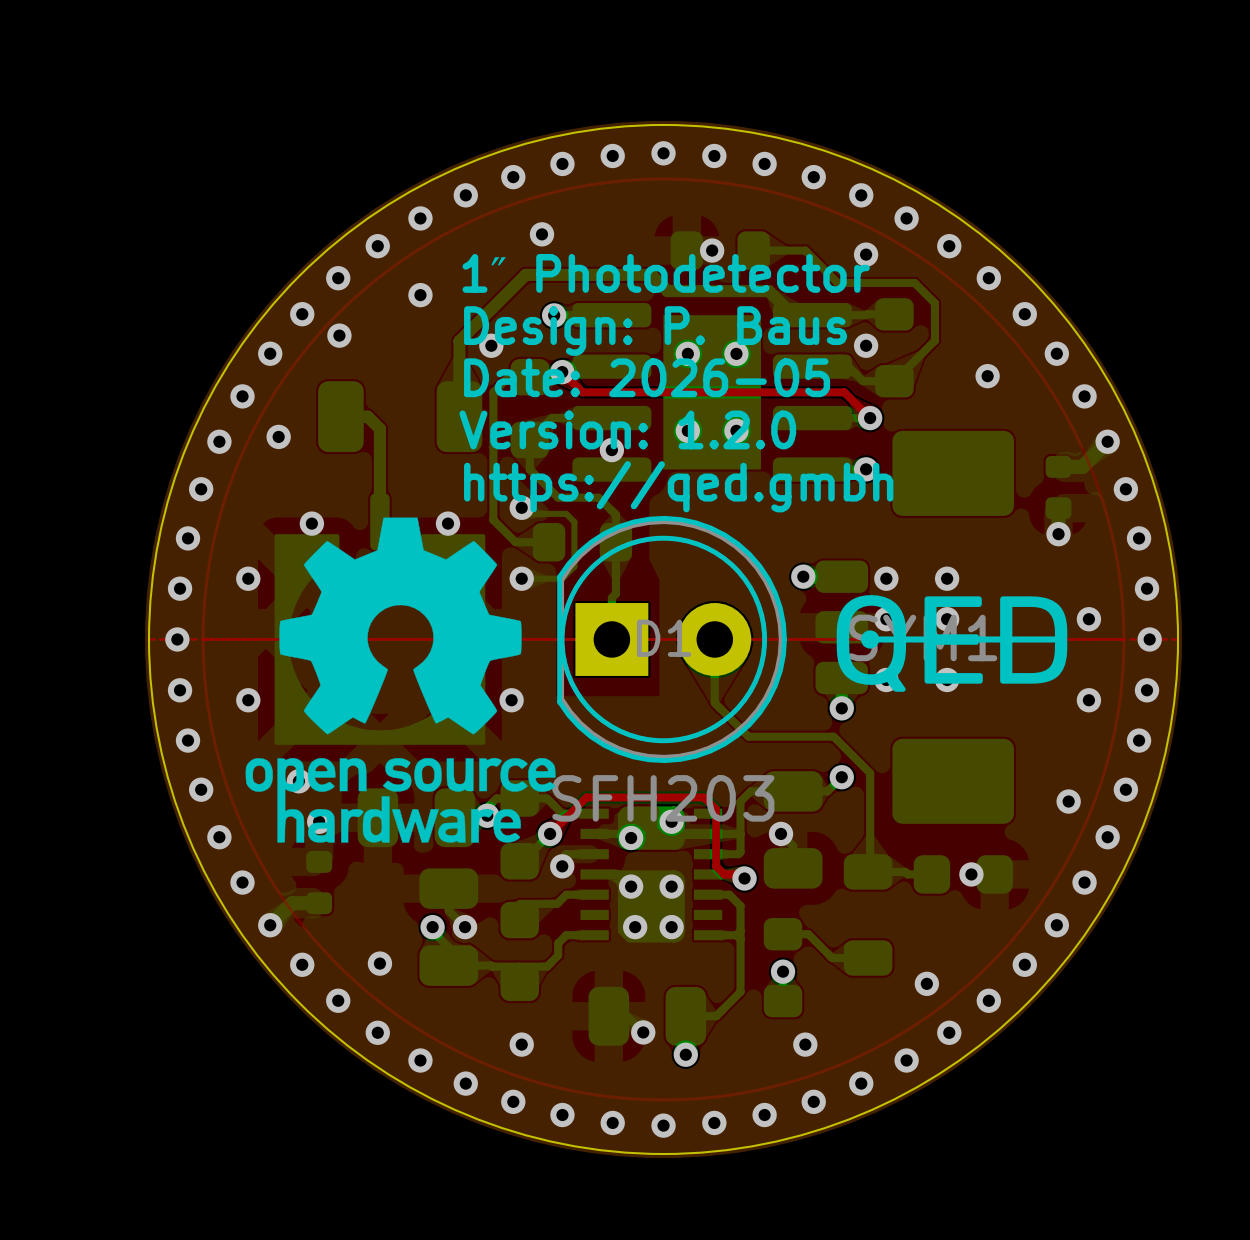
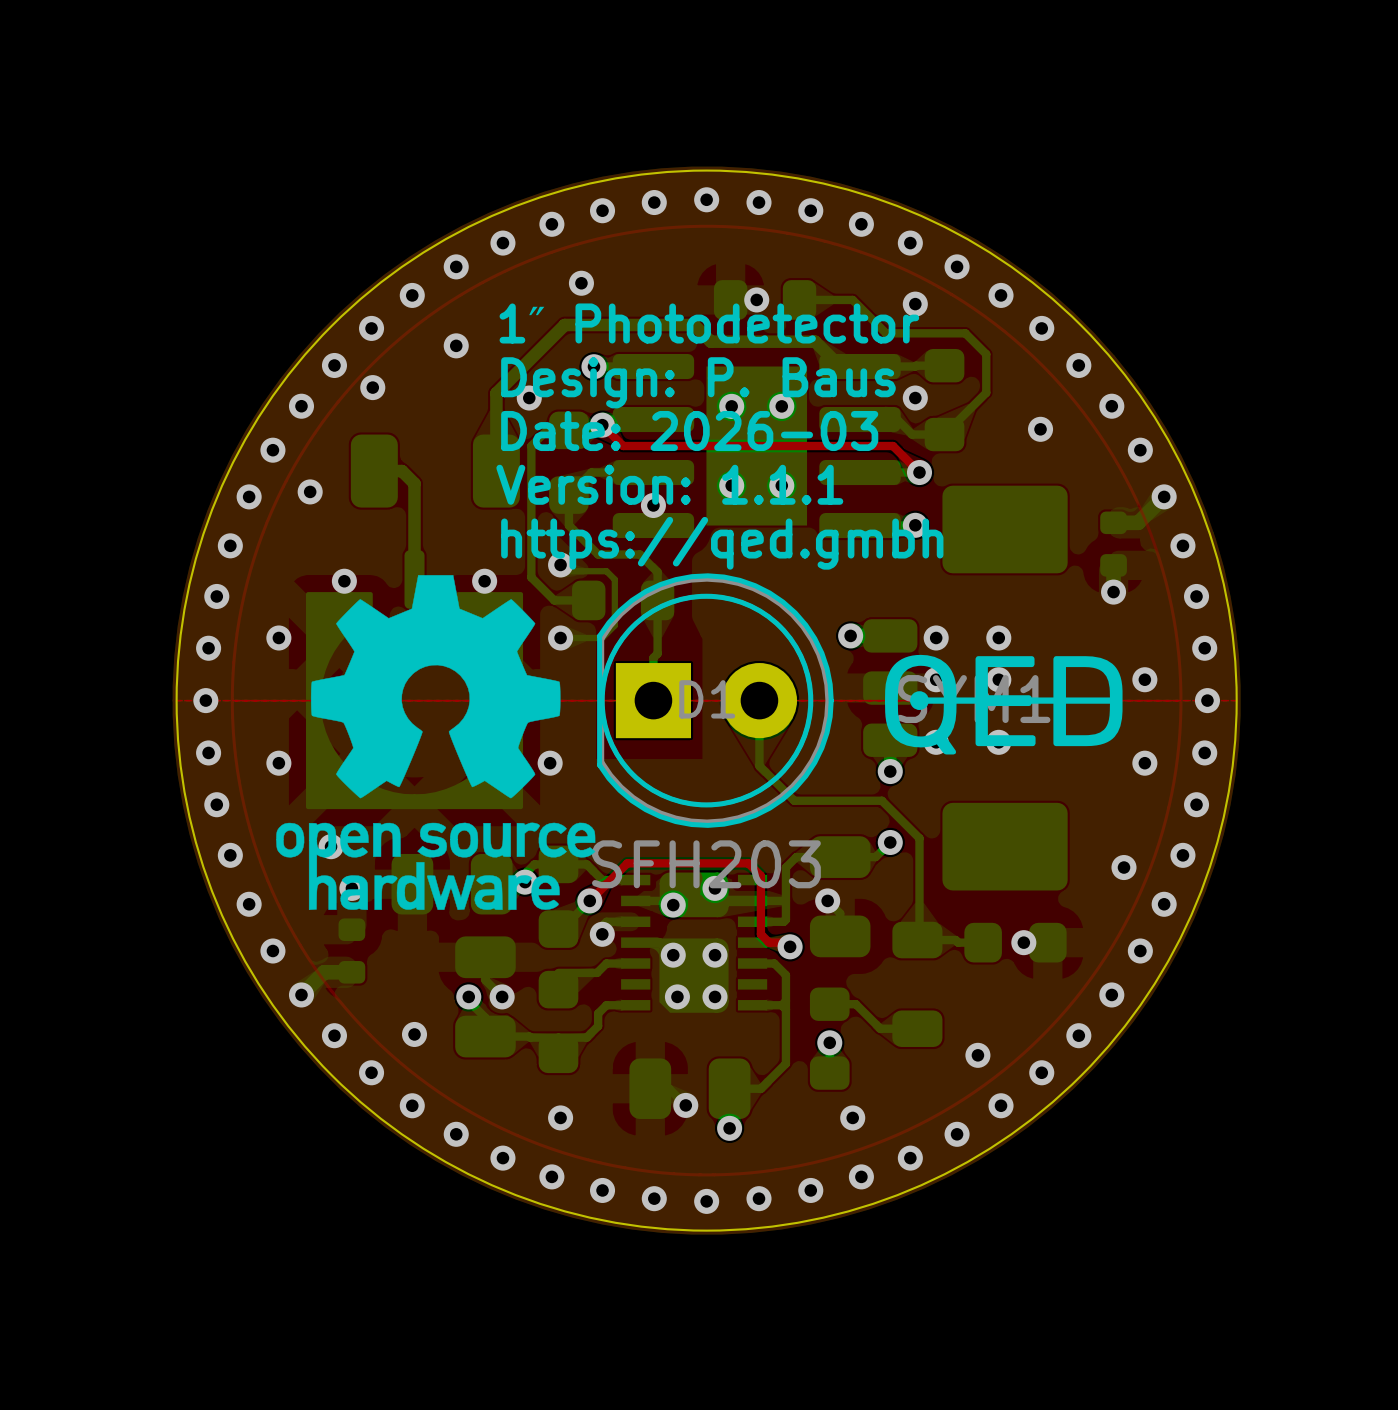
text: Date: 2026-05 (647, 377) -> Date: 2026-03 (689, 430)
text: Version: 1.2.0 (627, 429) -> Version: 1.1.1 (669, 484)

